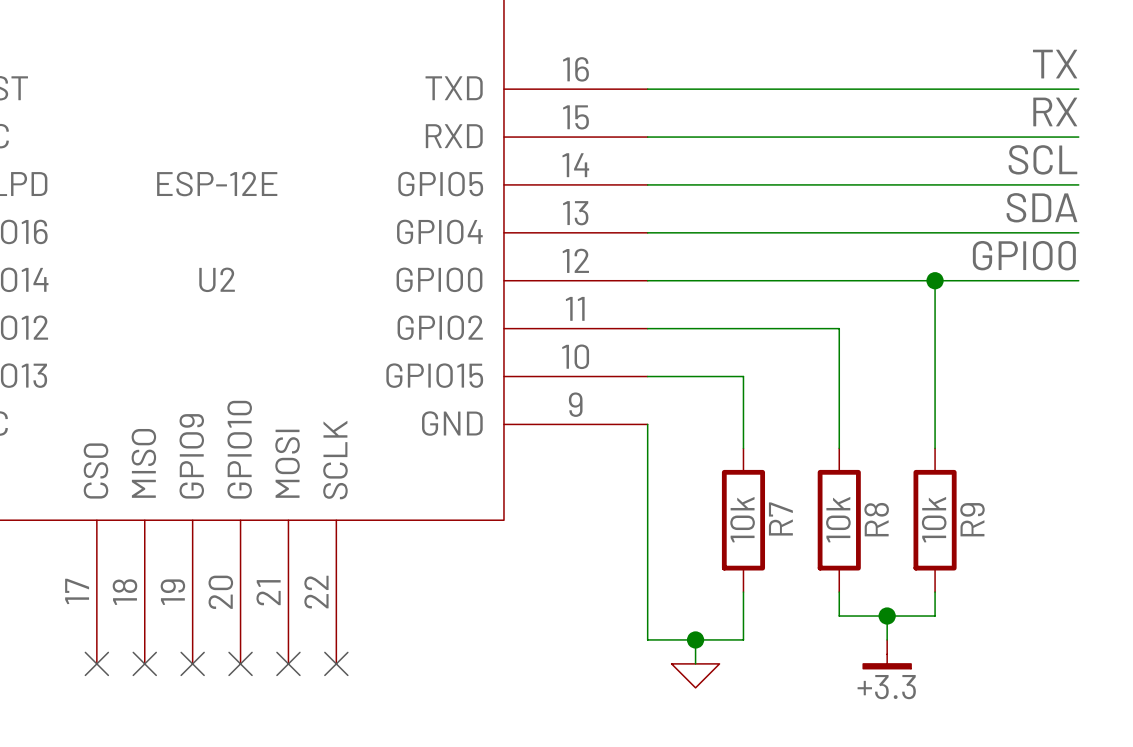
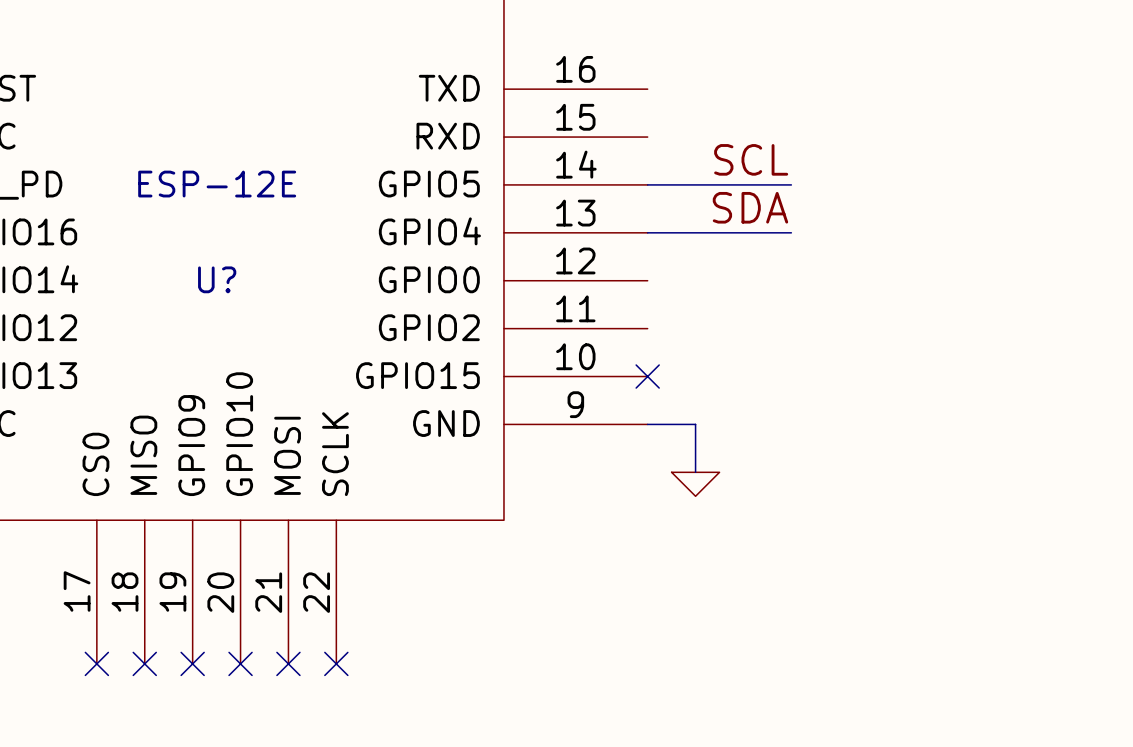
label: TX (1055, 64) -> none
wire: (647, 89) (1078, 89) -> none
label: RX (1055, 111) -> none
wire: (647, 137) (1078, 137) -> none
label position: SCL (1042, 159) -> SCL (751, 159)
wire: (791, 184) (1078, 184) -> none
label position: SDA (1041, 207) -> SDA (750, 207)
wire: (791, 232) (1078, 232) -> none
label: GPIO0 (1024, 255) -> none
U2 name: U2 (217, 279) -> U? (217, 279)
wire: (647, 280) (1078, 280) -> none
wire: (935, 280) (935, 448) -> none
junction: (935, 280) -> none
wire: (647, 328) (839, 328) (839, 448) -> none
wire: (647, 376) (743, 376) (743, 448) -> none
no-connect mark: none -> (647, 376)
wire: (647, 424) (647, 639) (743, 639) (743, 592) -> (647, 424) (695, 424) (695, 472)
R7: 10k (743, 520) -> none
R8: 10k (839, 520) -> none
R9: 10k (935, 520) -> none
wire: (839, 592) (839, 616) (935, 616) (935, 592) -> none
wire: (887, 616) (887, 639) -> none
junction: (887, 616) -> none
wire: (695, 639) (695, 663) -> none
junction: (695, 639) -> none
power symbol: +3.3 (887, 654) -> none
power symbol position: (695, 675) -> (695, 484)

